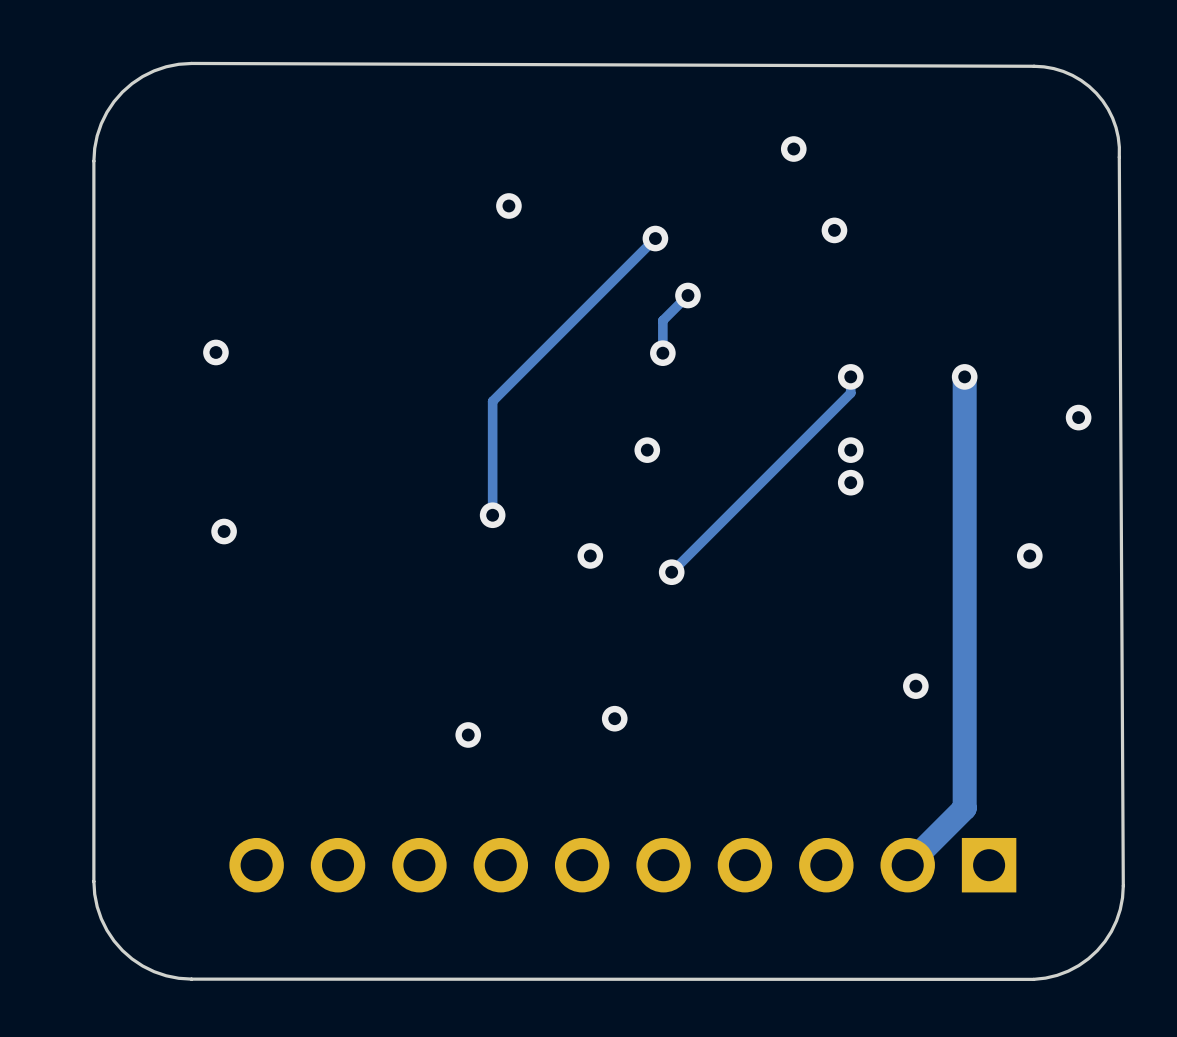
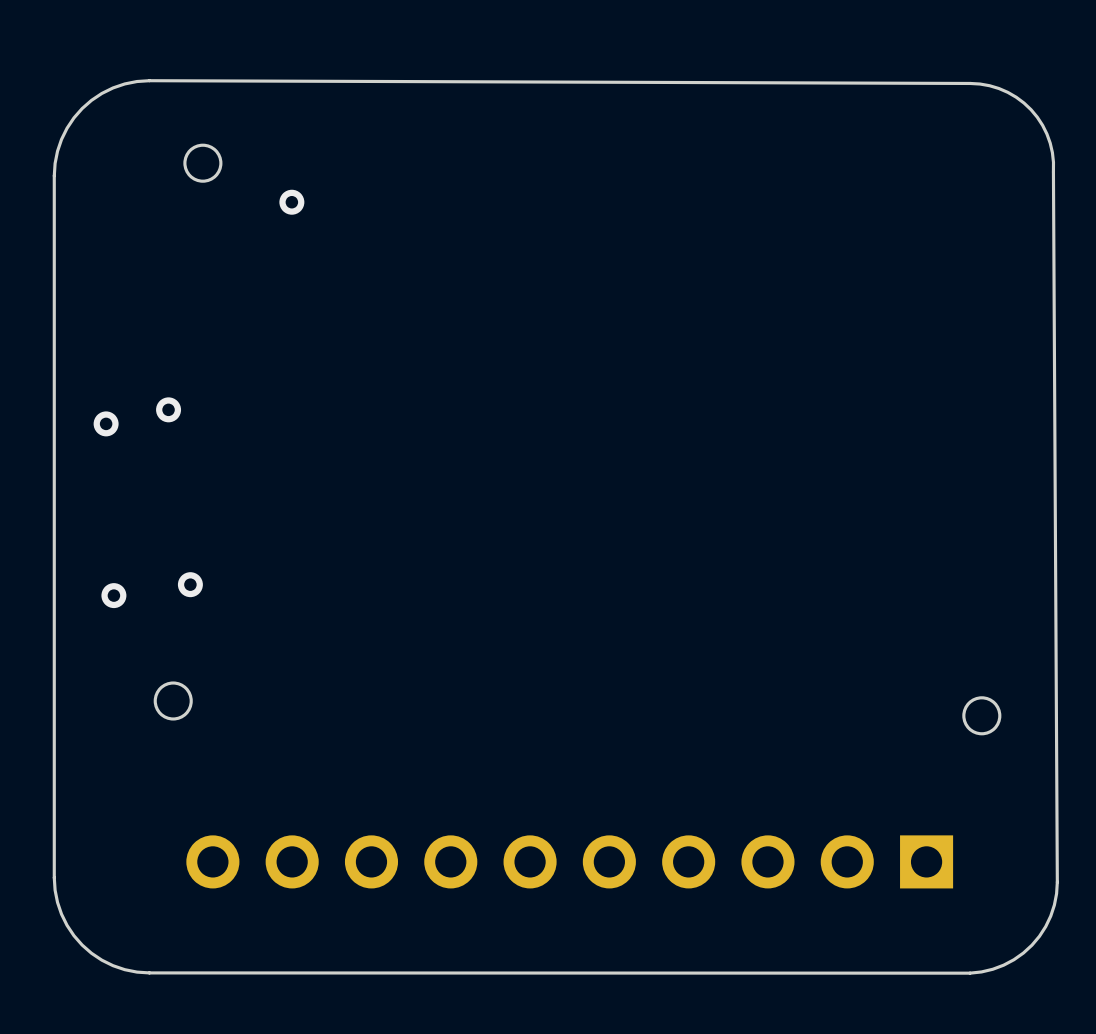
round board edge: none -> [183, 143, 223, 183]
via: (793, 149) -> none
via: none -> (291, 202)
via: (508, 205) -> none
via: (834, 230) -> none
track: (655, 238) (492, 401) (492, 515) -> none
via: (655, 238) -> none
track: (687, 295) (662, 320) (662, 353) -> none
via: (687, 295) -> none
via: (215, 352) -> none
via: (662, 353) -> none
track: (850, 376) (850, 393) (671, 572) -> none
via: (850, 376) -> none
track: (964, 376) (964, 808) (907, 865) -> none
via: (964, 376) -> none
via: none -> (168, 409)
via: none -> (106, 423)
via: (1078, 417) -> none
via: (647, 450) -> none
via: (850, 450) -> none
via: (850, 482) -> none
via: (492, 515) -> none
via: (224, 531) -> none
via: (590, 555) -> none
via: (1029, 555) -> none
via: (671, 572) -> none
via: none -> (190, 584)
via: none -> (113, 595)
round board edge: none -> [153, 681, 193, 721]
via: (915, 686) -> none
round board edge: none -> [962, 696, 1002, 736]
via: (614, 718) -> none
via: (468, 734) -> none

